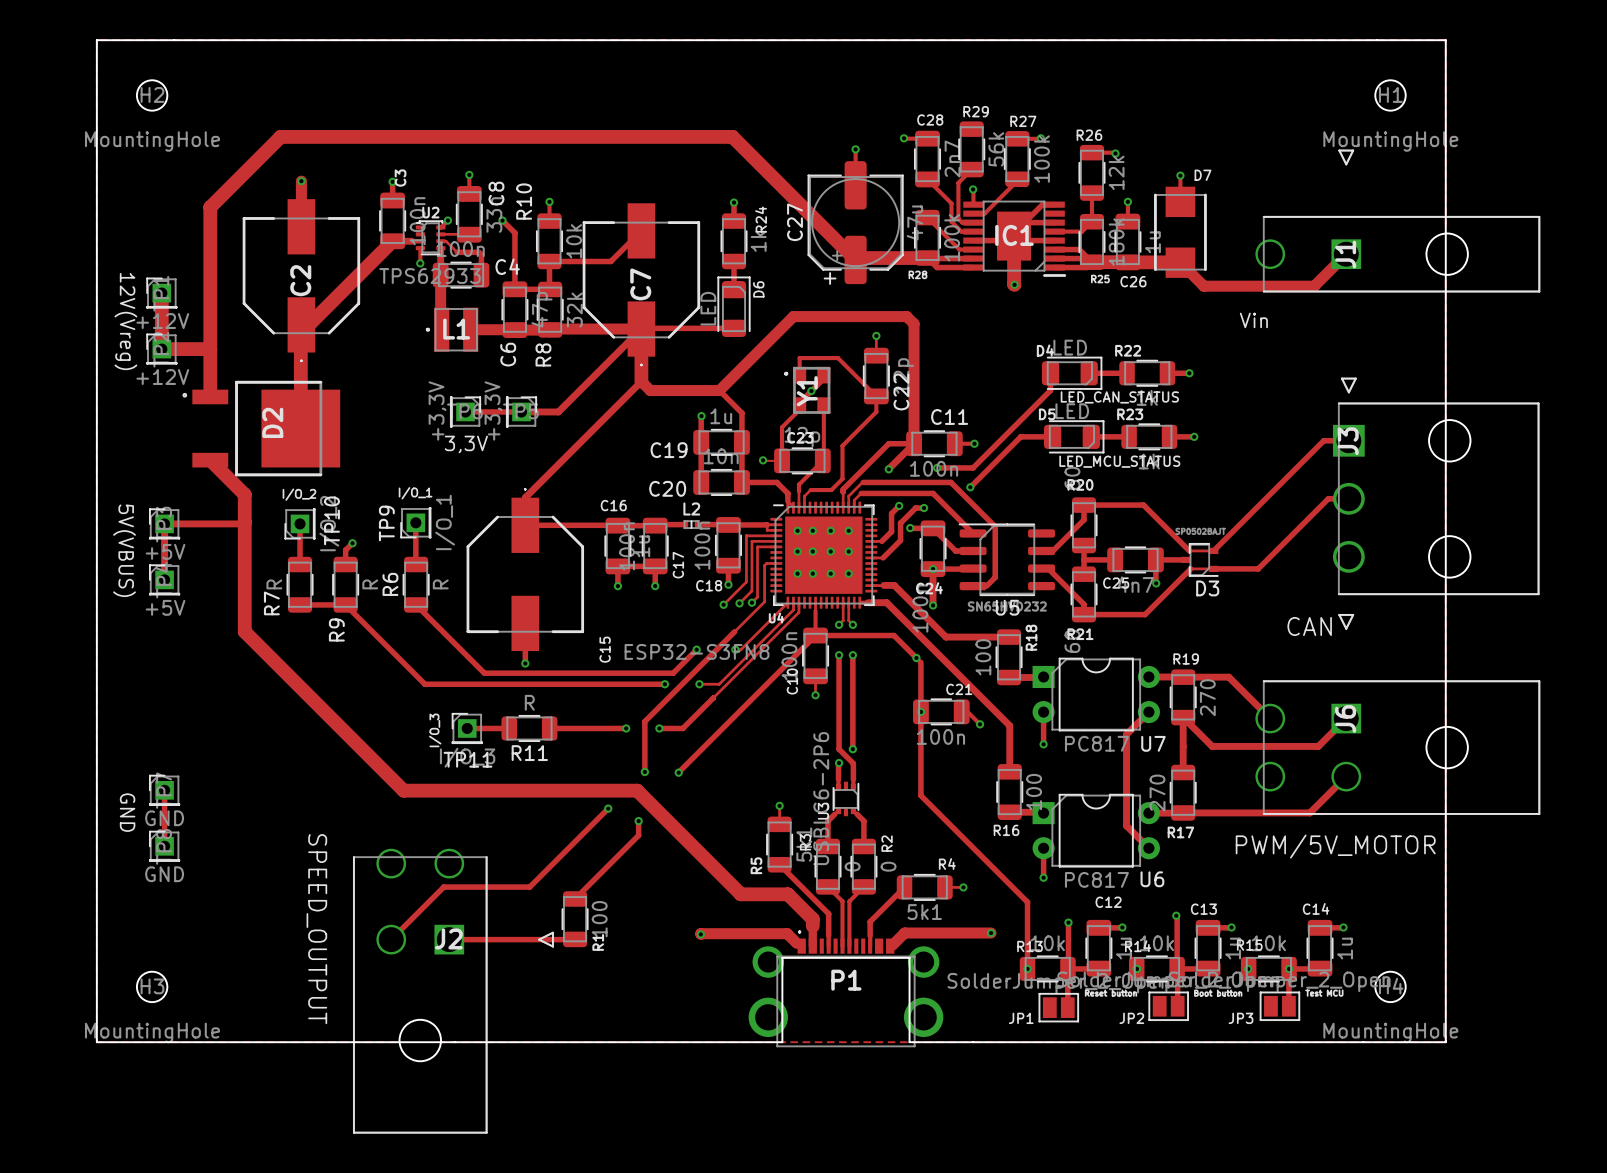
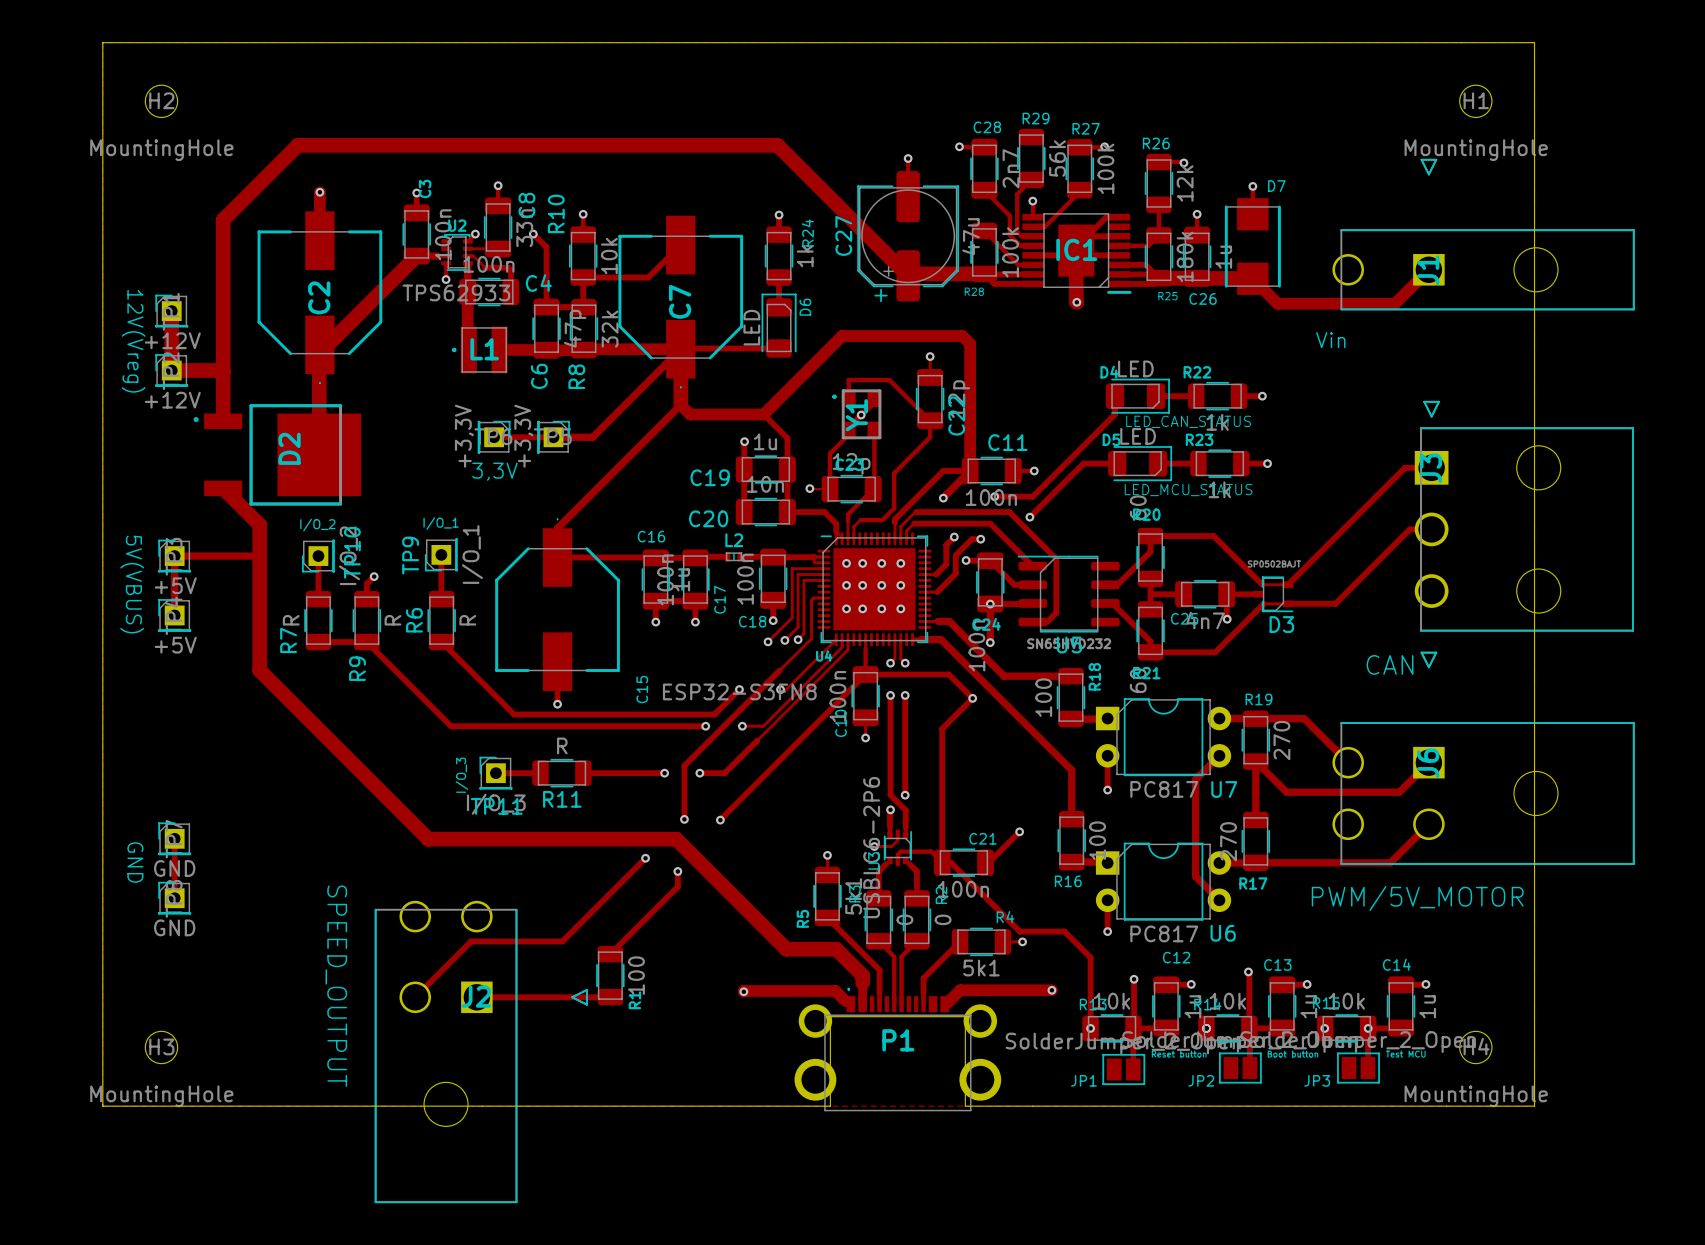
track: (916, 657) (920, 662) (920, 795) (1003, 877) -> (972, 698) (942, 728) (942, 862)
via: (920, 711) -> none
C21 position: (941, 711) -> (963, 862)
track: (961, 711) (967, 711) (980, 724) -> none
via: (980, 724) -> none
track: none -> (1019, 831) (988, 862) (985, 862)
via: none -> (1019, 831)
track: none -> (897, 834) (897, 840) (891, 846) (874, 846)
via: none -> (874, 846)
track: none -> (897, 861) (897, 854) (900, 851) (931, 851) (942, 862)
track: none -> (942, 862) (950, 862) (1019, 931) (1064, 931)

